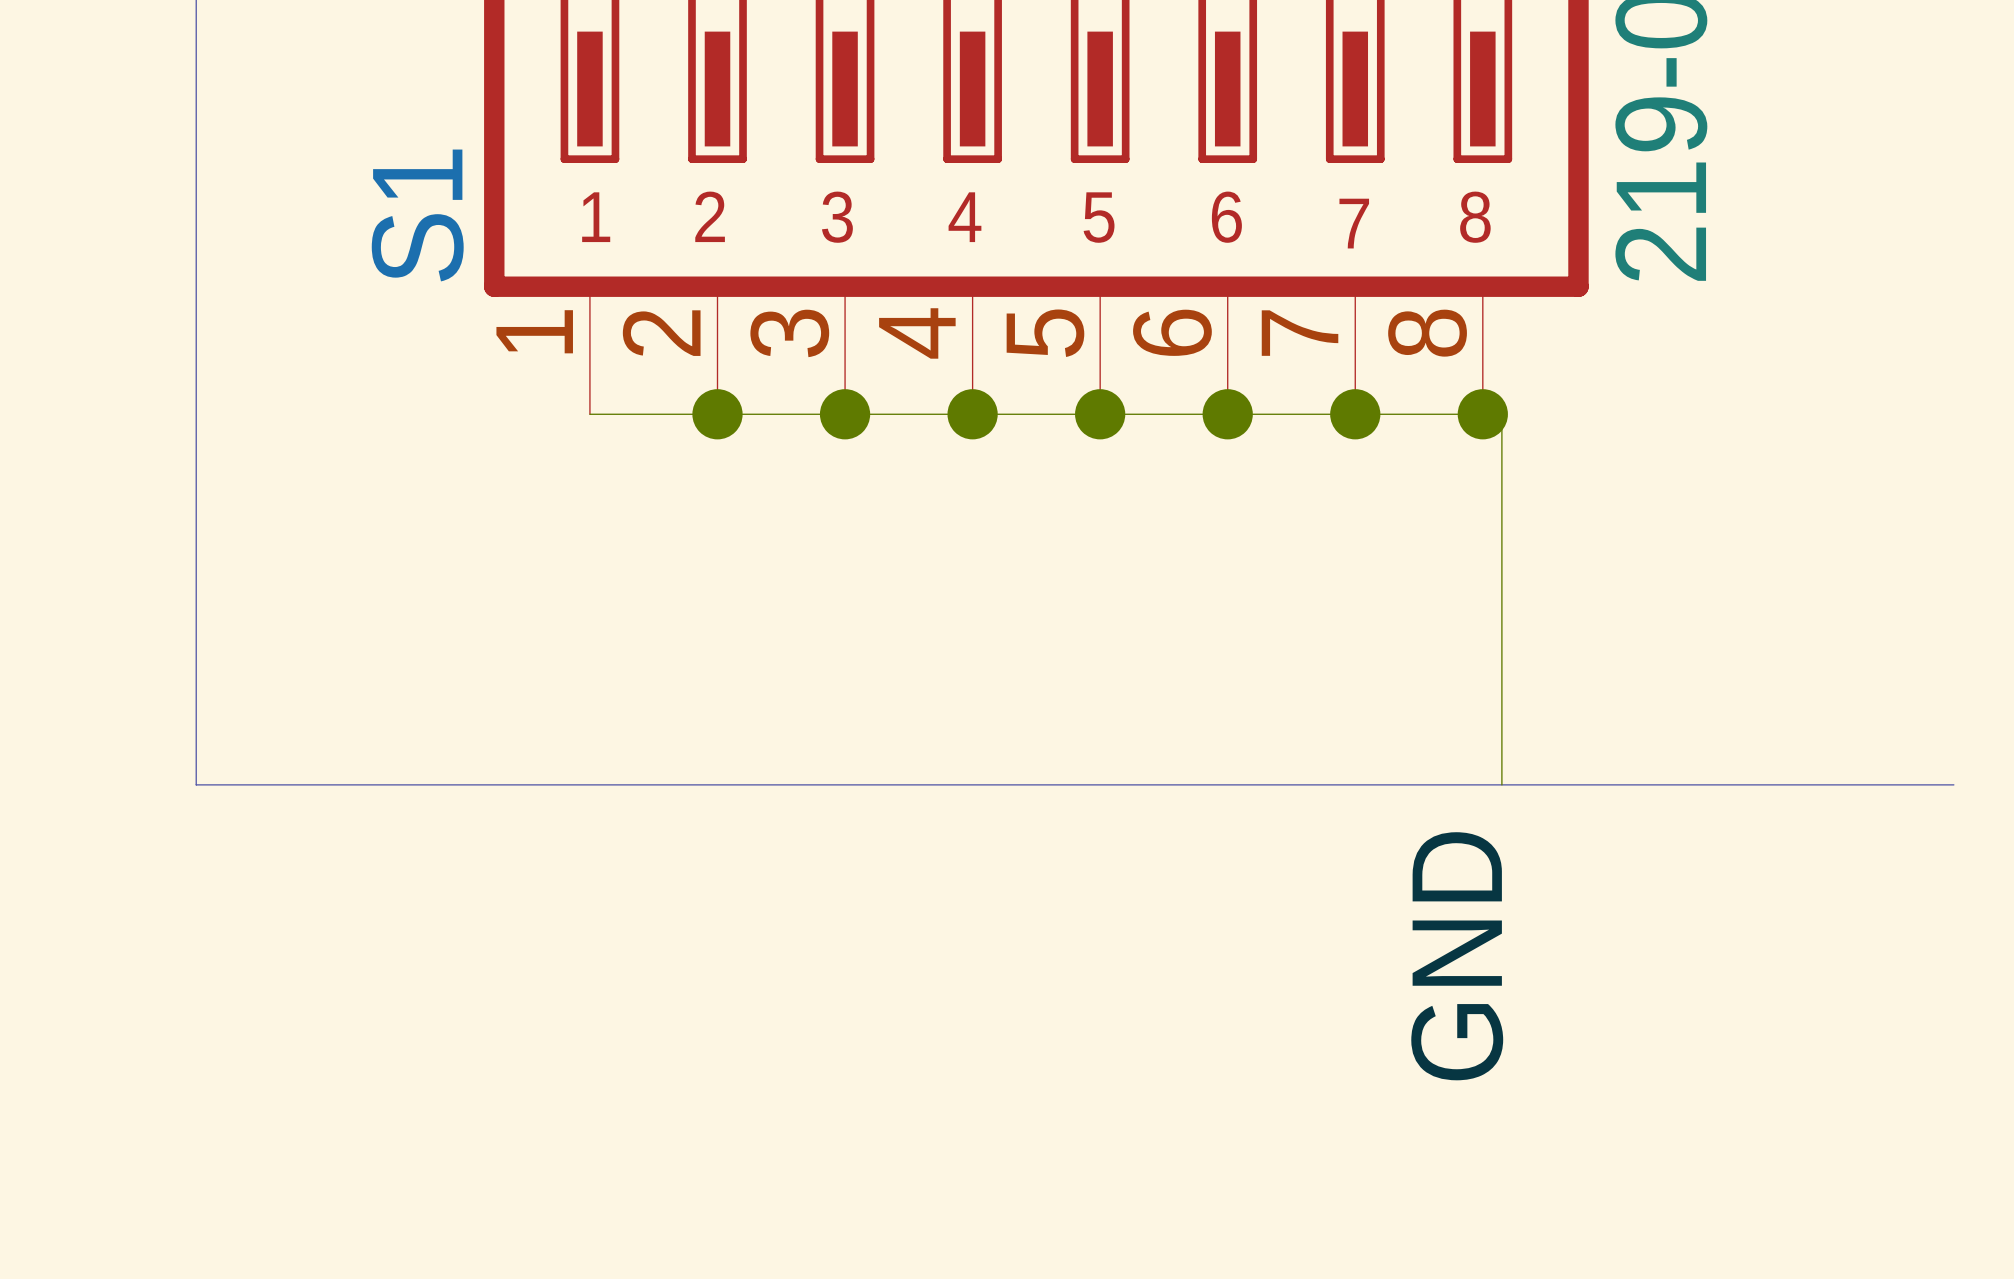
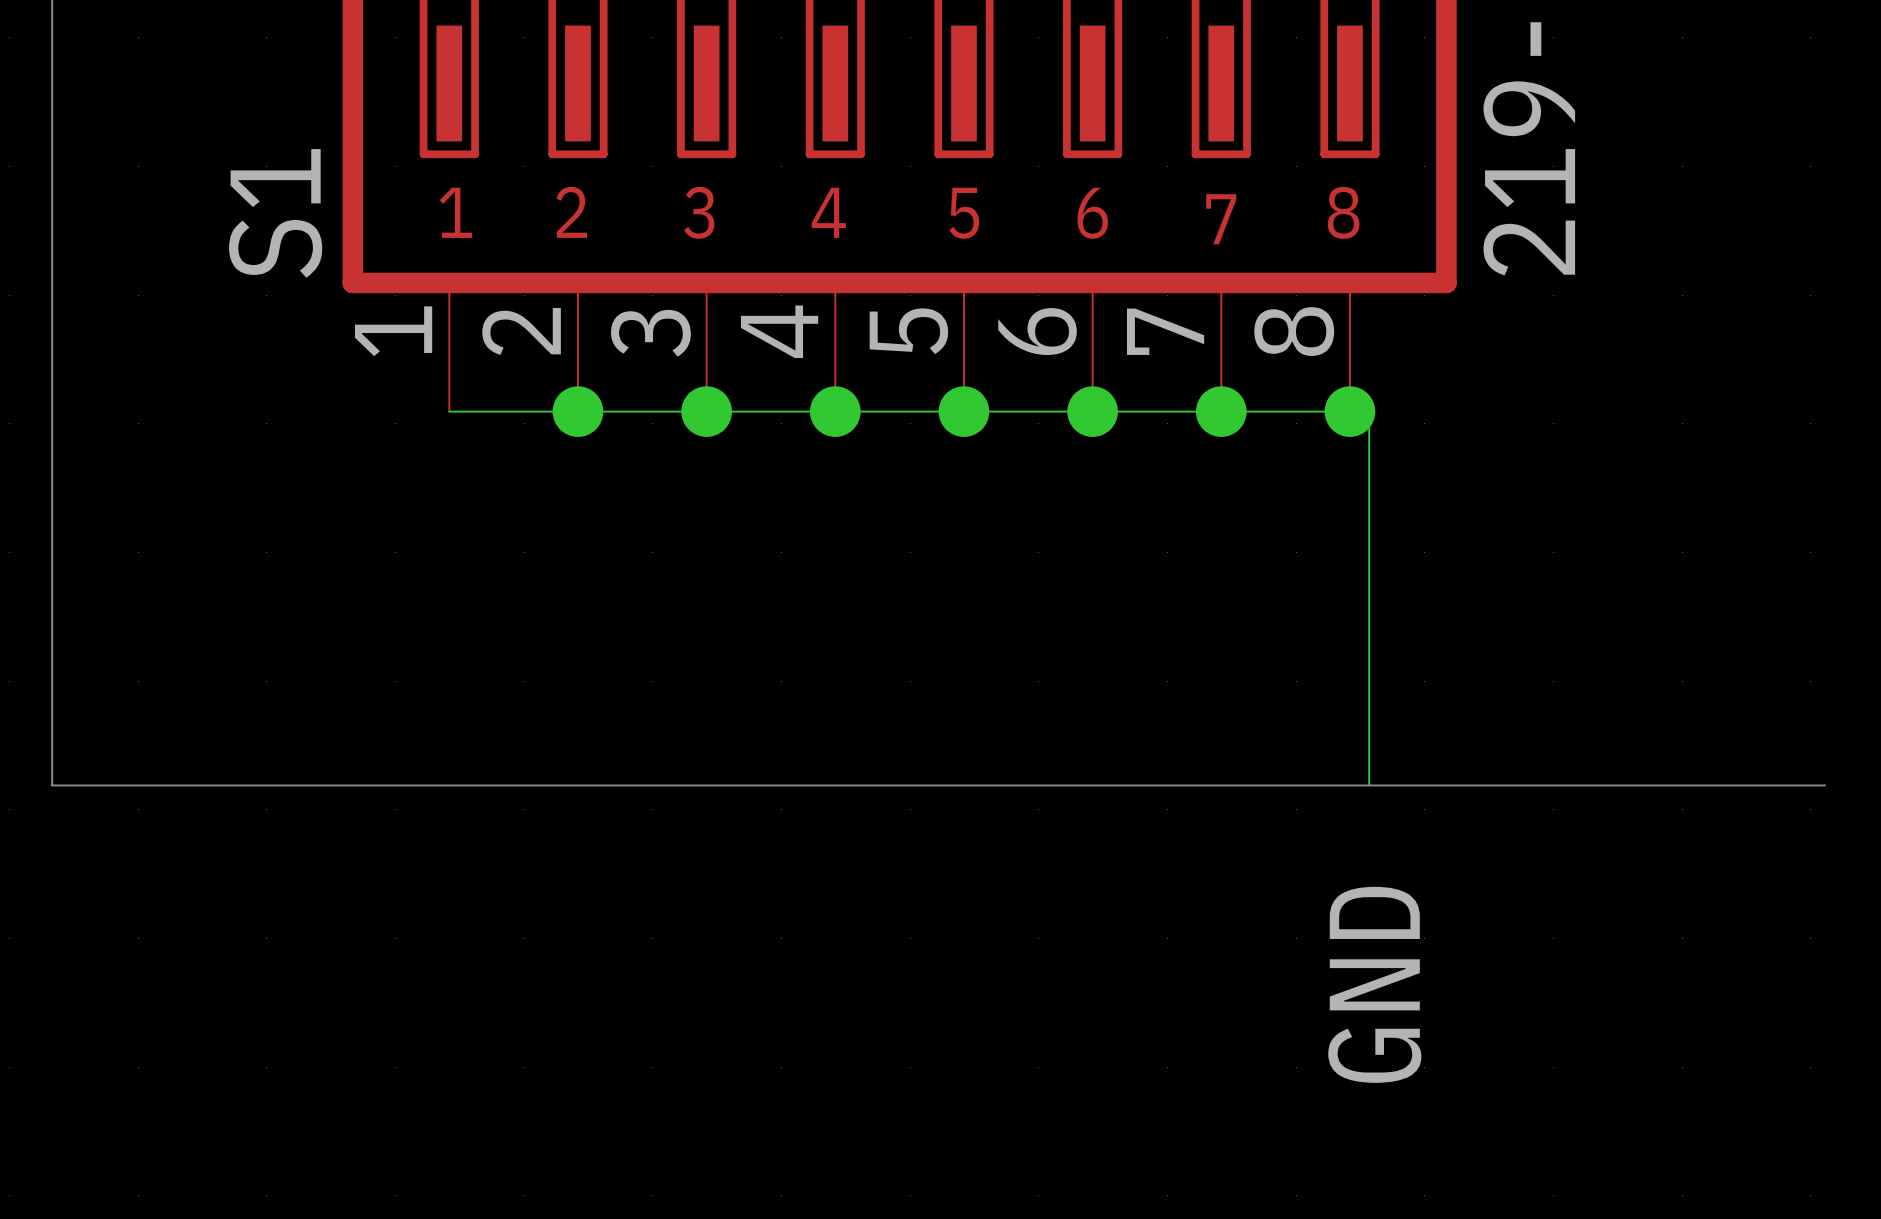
label position: GND (1457, 956) -> GND (1374, 984)

